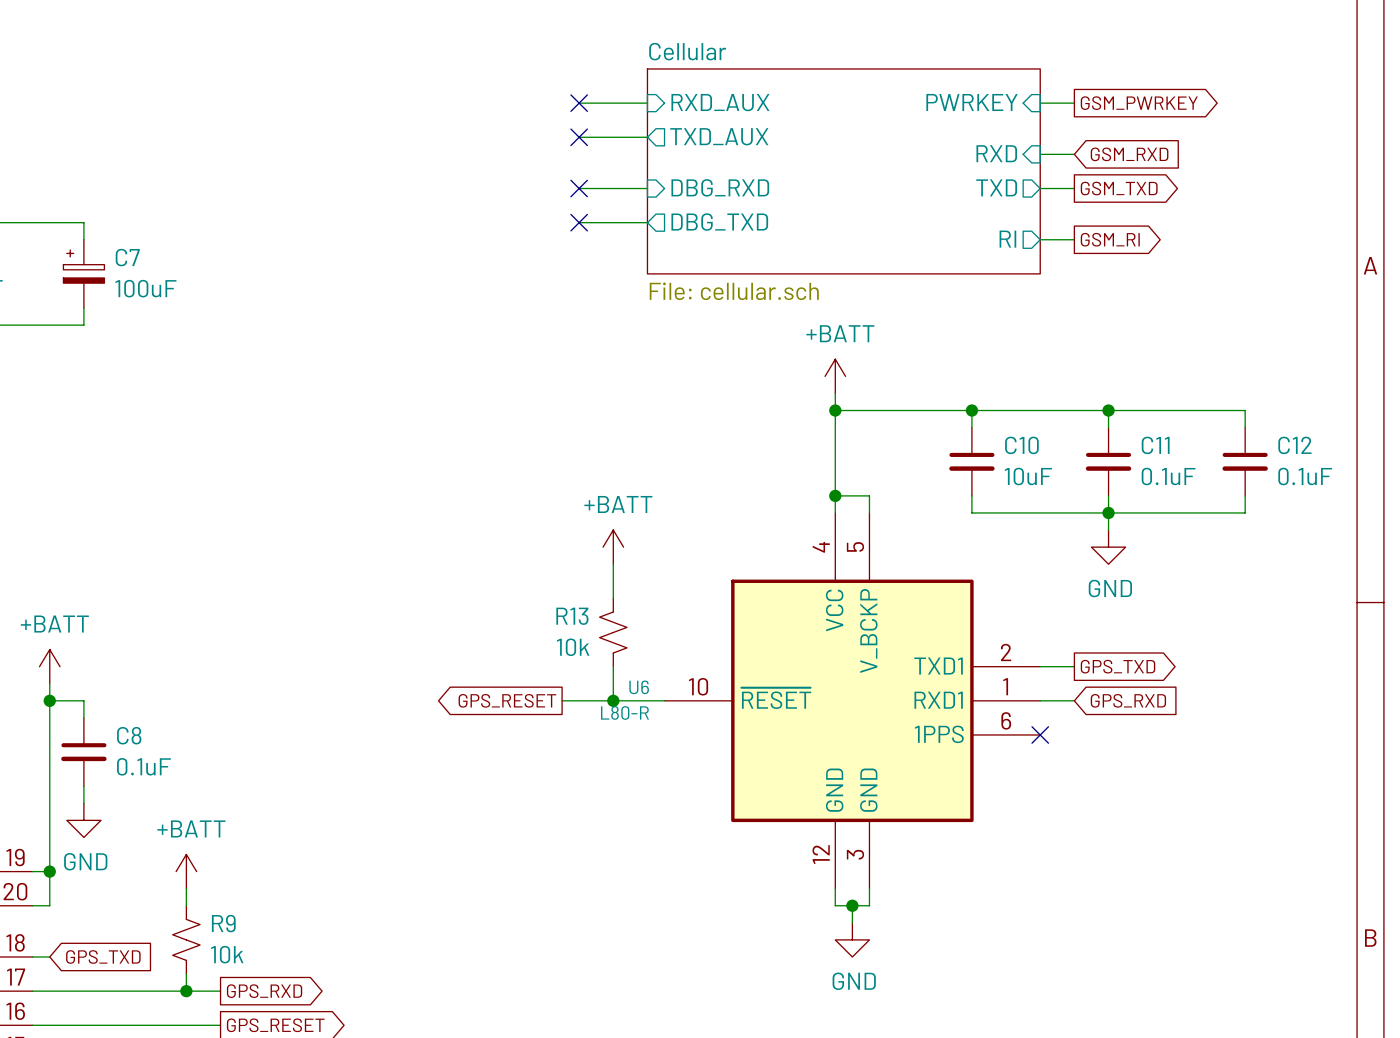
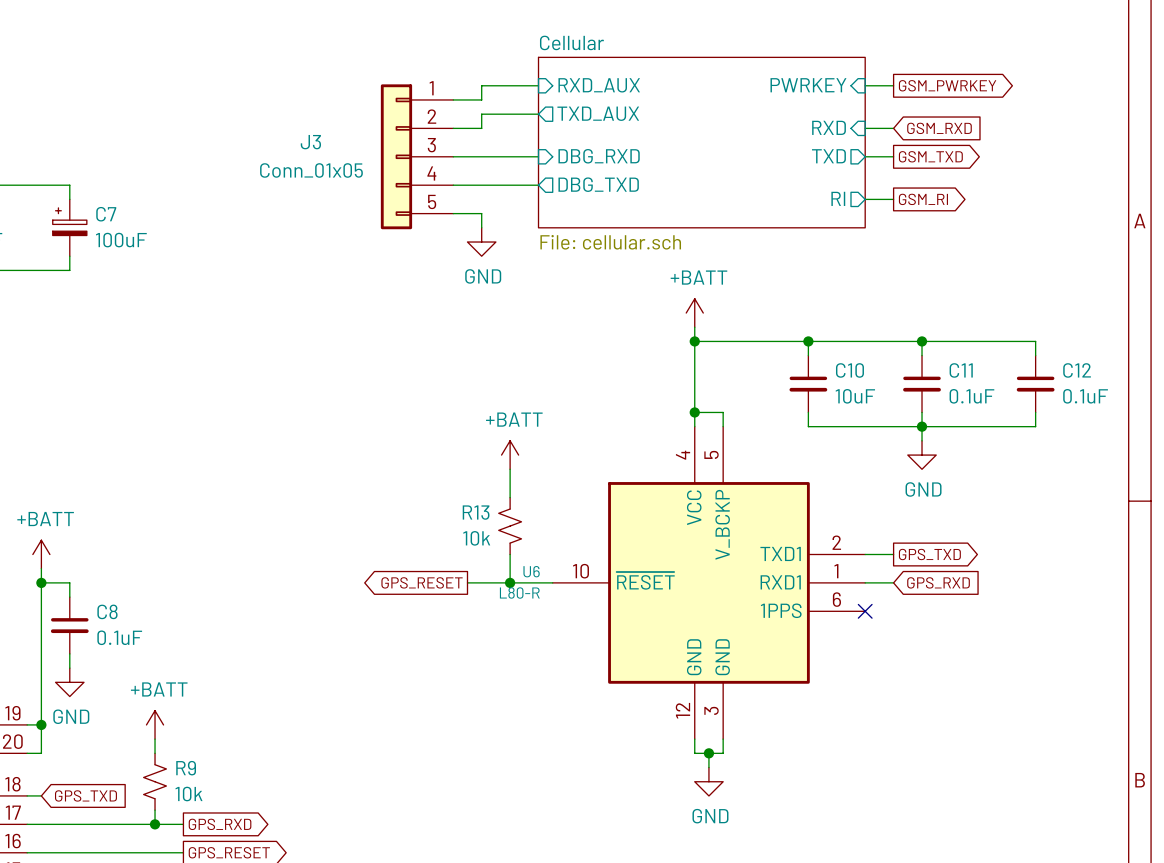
wire: none -> (481, 85) (481, 99) (453, 99)
no-connect mark: (579, 103) -> none
wire: none -> (481, 114) (481, 128) (453, 128)
no-connect mark: (579, 137) -> none
J3: none -> Conn_01x05 (417, 156)
wire: none -> (453, 156) (481, 156)
no-connect mark: (579, 188) -> none
wire: none -> (453, 185) (481, 185)
no-connect mark: (579, 222) -> none
wire: none -> (453, 213) (481, 213) (481, 227)
power symbol: none -> GND (481, 242)

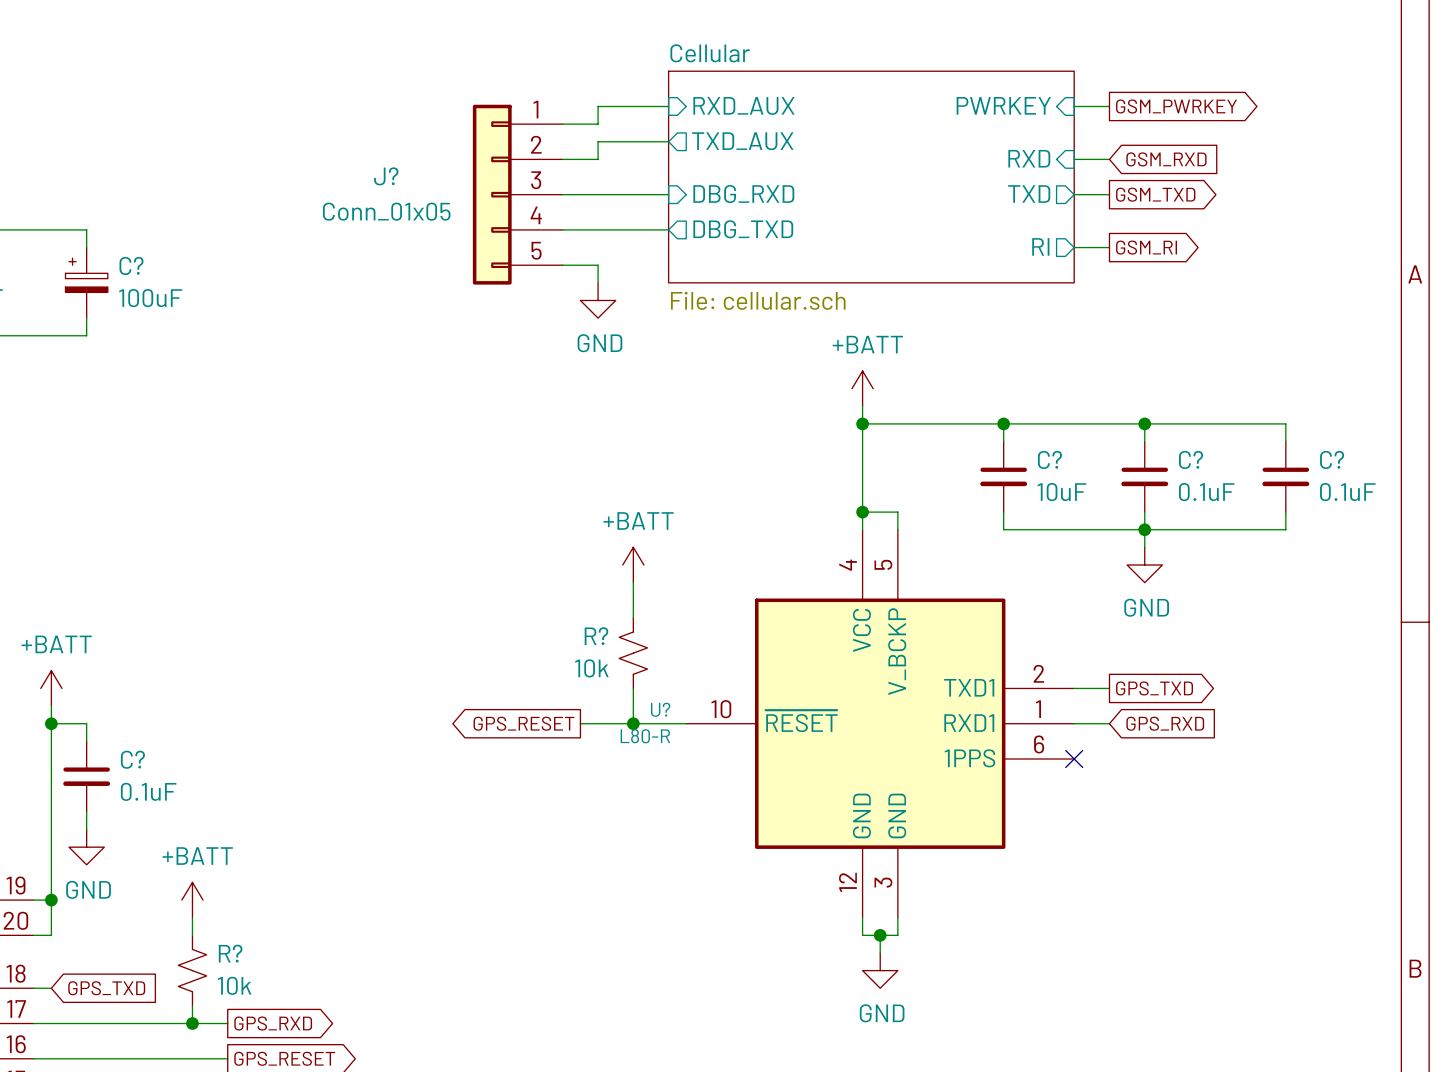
J3 name: J3 (310, 142) -> J? (386, 176)
C7 name: C7 (106, 214) -> C? (131, 265)
C10 name: C10 (849, 370) -> C? (1049, 459)
C11 name: C11 (961, 370) -> C? (1191, 459)
C12 name: C12 (1077, 370) -> C? (1332, 459)
R13 name: R13 (476, 512) -> R? (596, 636)
U6 name: U6 (531, 571) -> U? (660, 709)
C8 name: C8 (107, 611) -> C? (132, 759)
R9 name: R9 (186, 768) -> R? (230, 953)

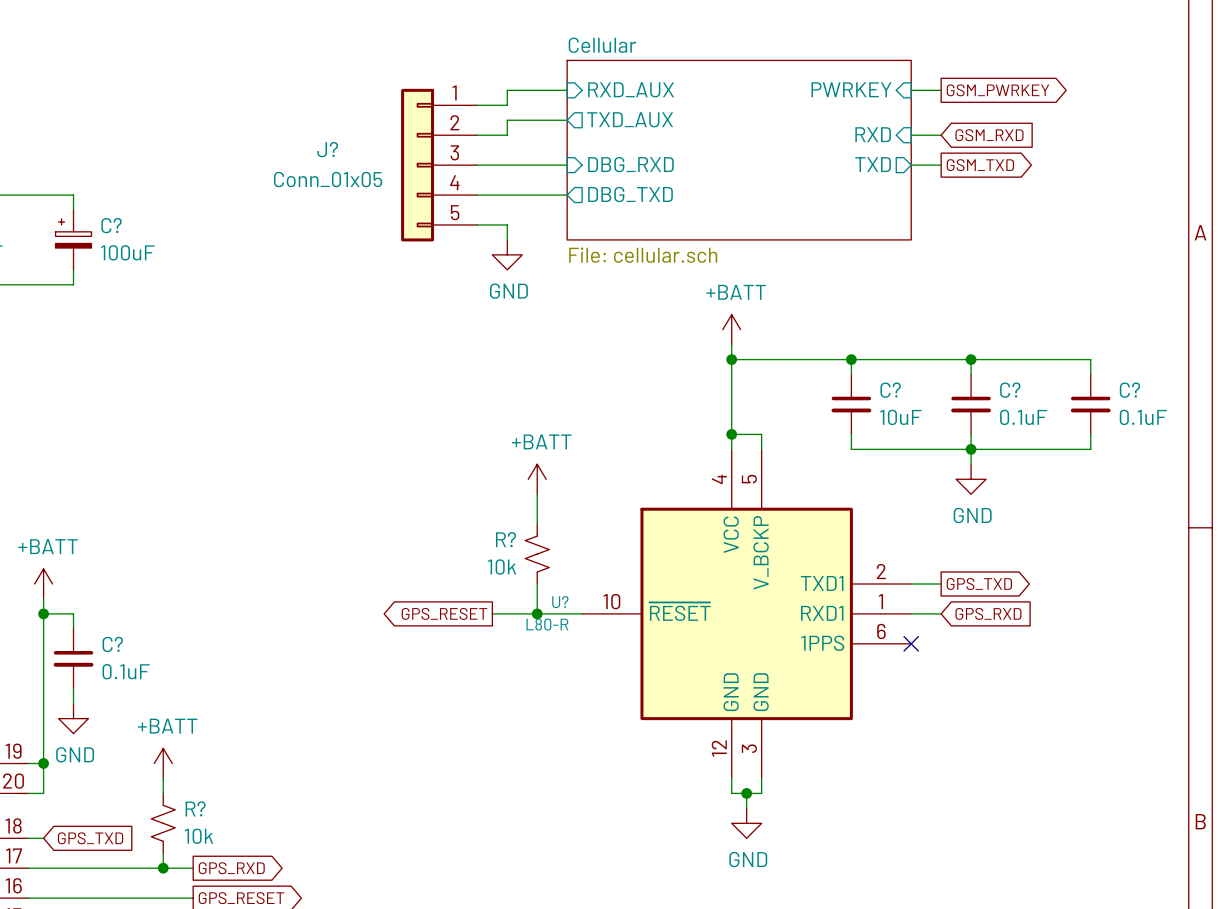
sheet pin: RI (1040, 246) -> none
wire: (1074, 247) (1109, 247) -> none
global label: GSM_RI (1146, 247) -> none

